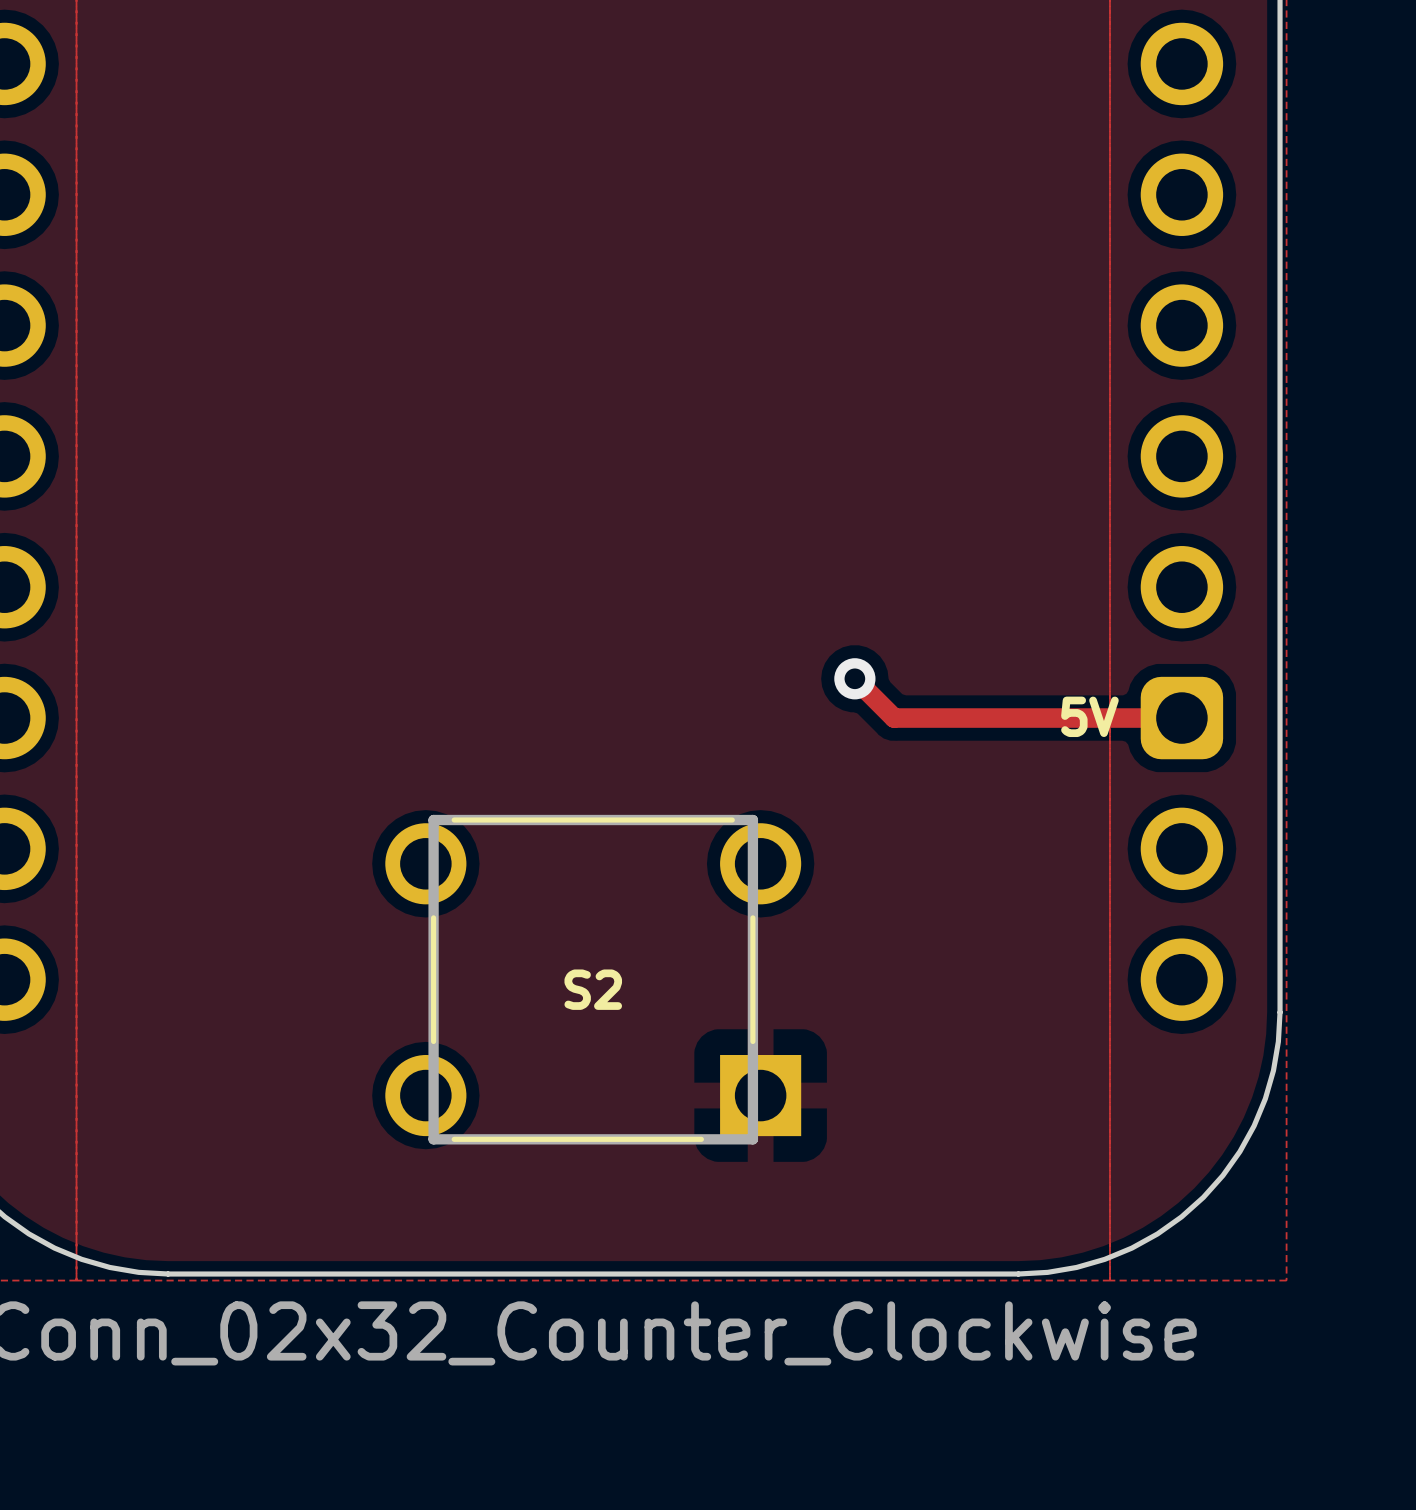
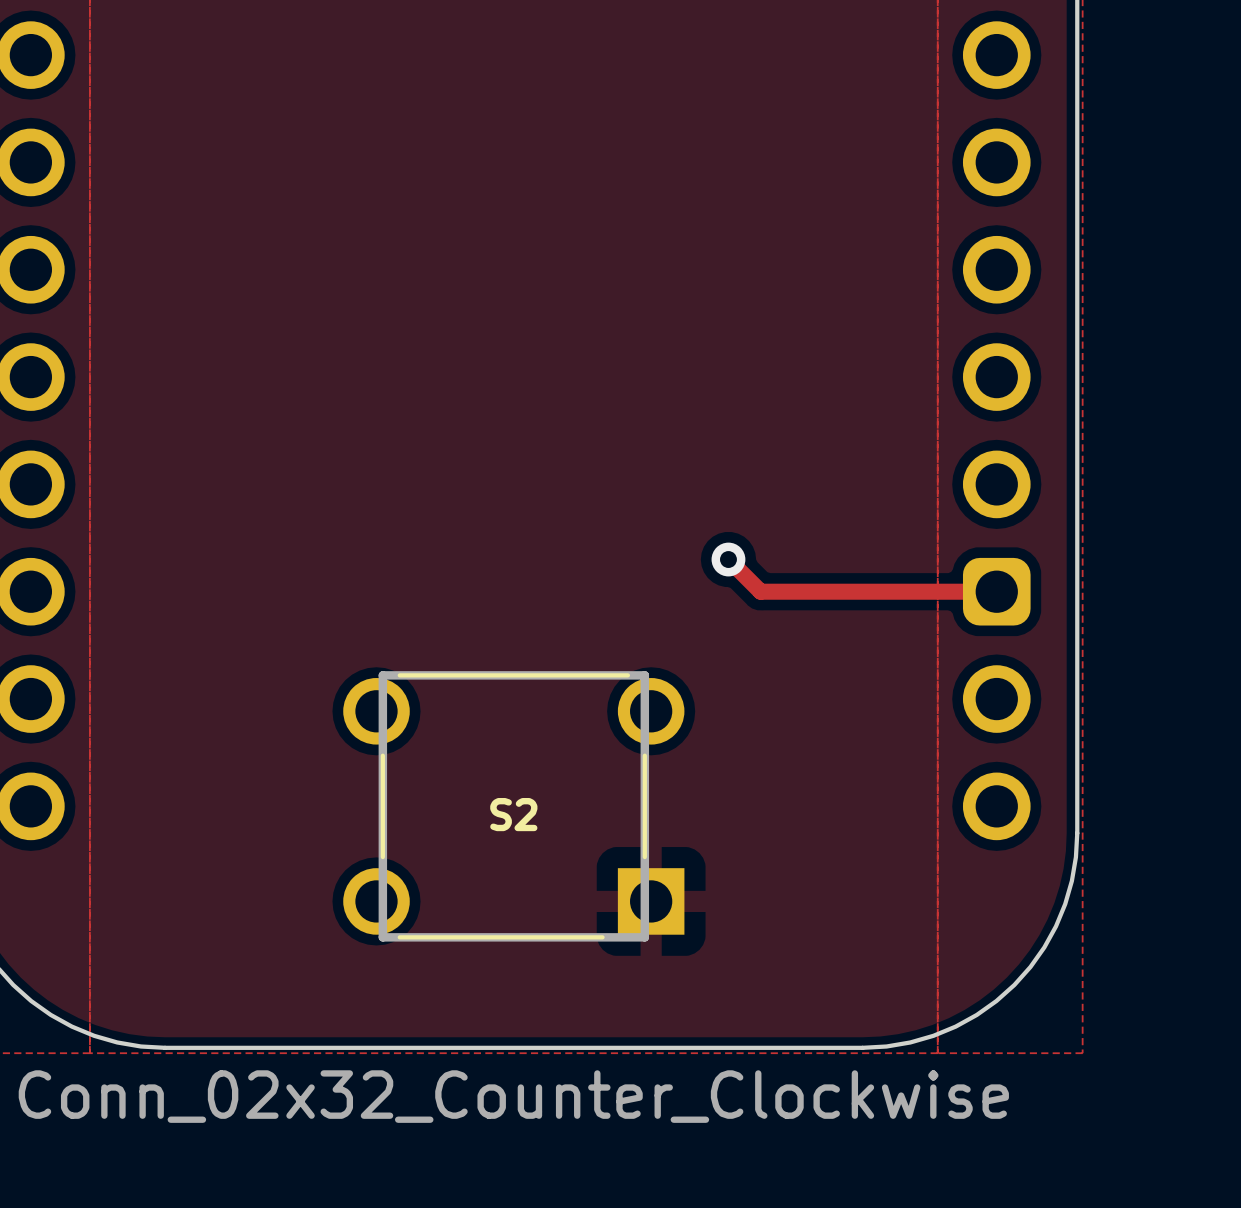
text: 5V (1089, 716) -> none

